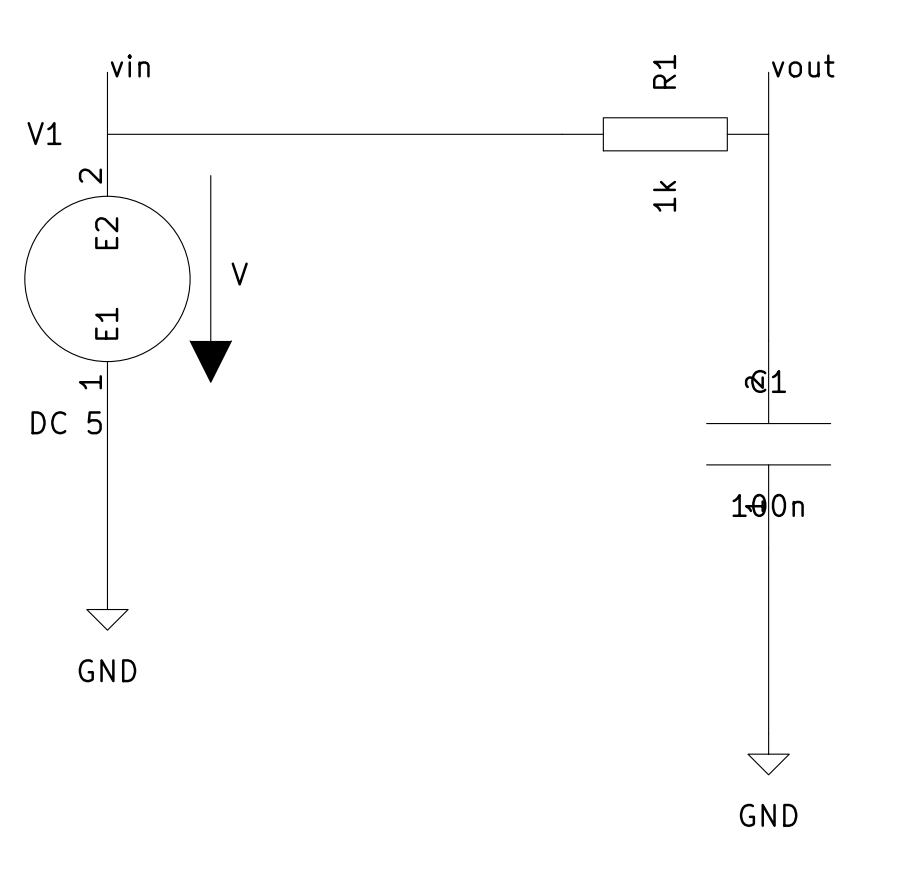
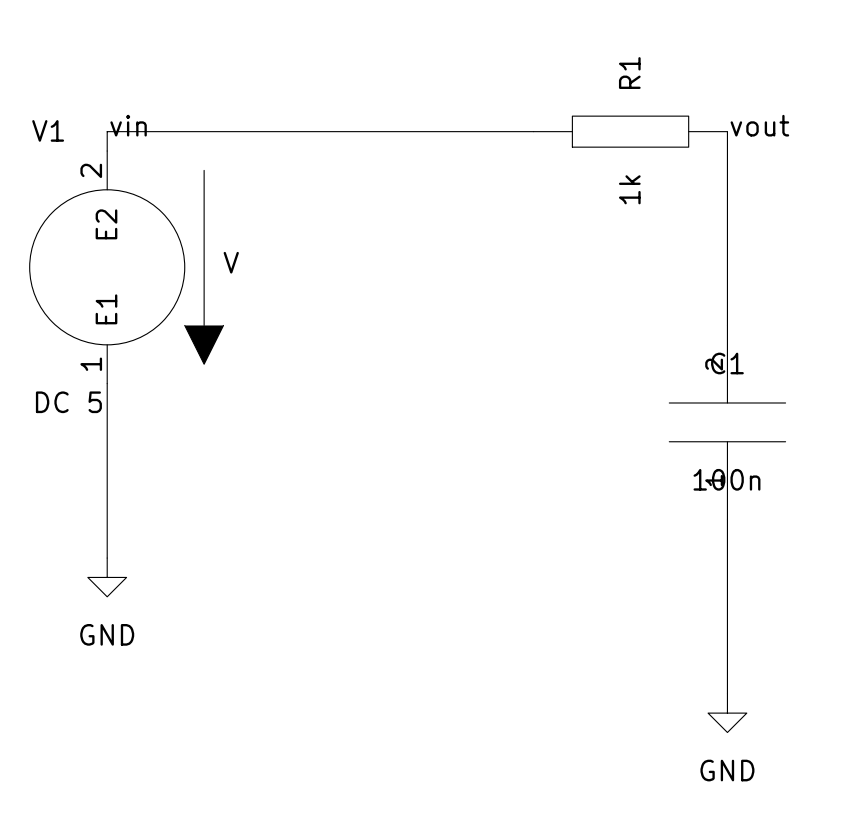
label position: vin (130, 65) -> vin (128, 125)
label position: vout (803, 65) -> vout (759, 125)
wire: (107, 72) (107, 134) -> none
wire: (768, 72) (768, 134) -> none

